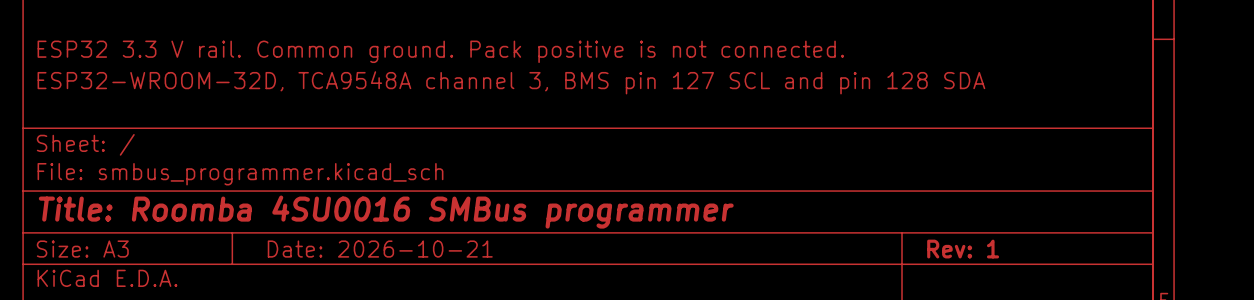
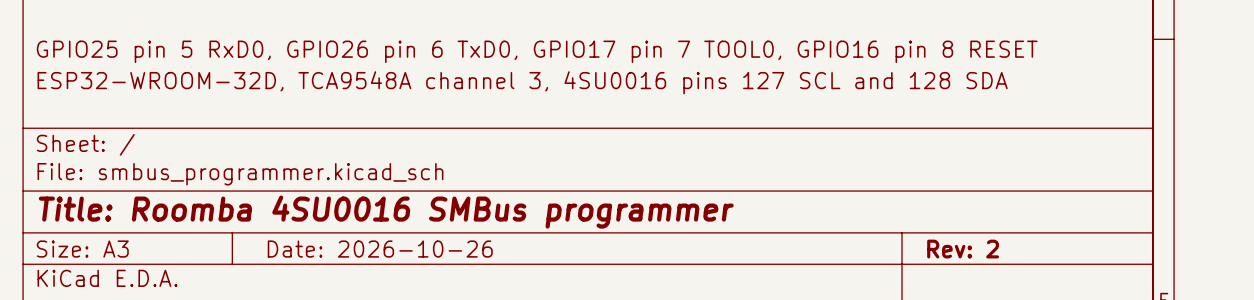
title block: ESP32 3.3 V rail. Common ground. Pack positive is not connected. (440, 51) -> GPIO25 pin 5 RxD0, GPIO26 pin 6 TxD0, GPIO17 pin 7 TOOL0, GPIO16 pin 8 RESET (537, 51)
title block: ESP32-WROOM-32D, TCA9548A channel 3, BMS pin 127 SCL and pin 128 SDA (511, 82) -> ESP32-WROOM-32D, TCA9548A channel 3, 4SU0016 pins 127 SCL and 128 SDA (522, 82)
title block: Date: 2026-10-21 (380, 249) -> Date: 2026-10-26 (380, 249)
title block: Rev: 1 (963, 249) -> Rev: 2 (963, 249)

